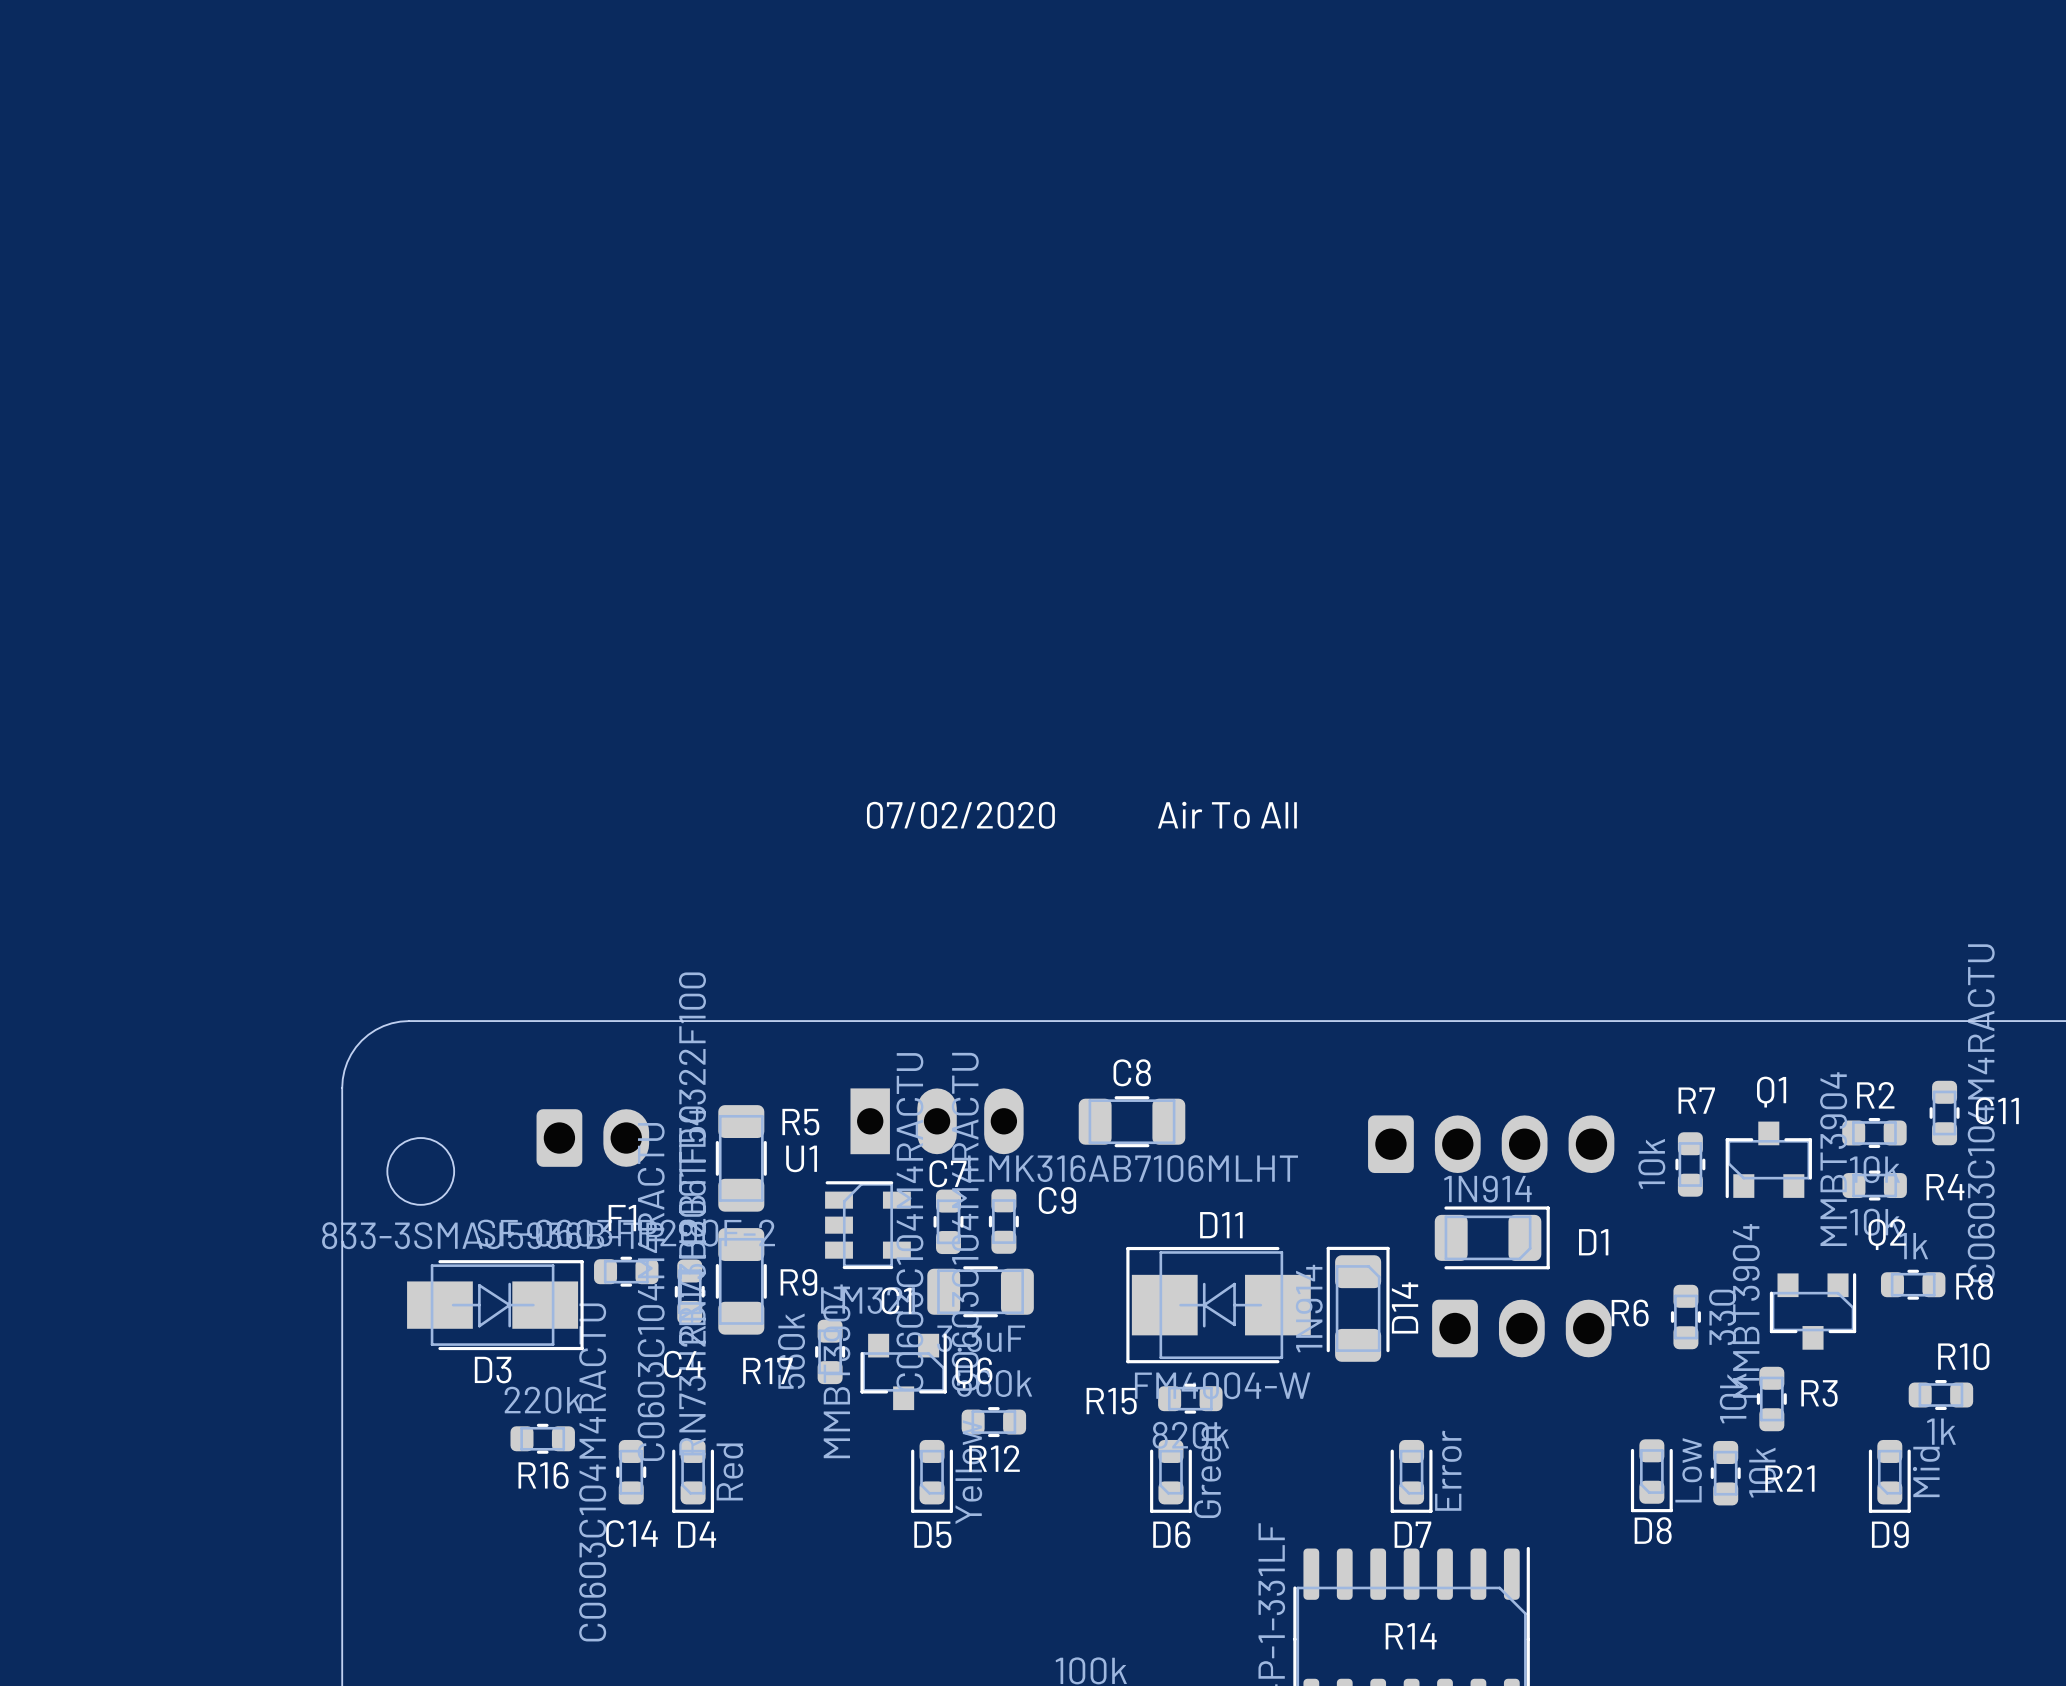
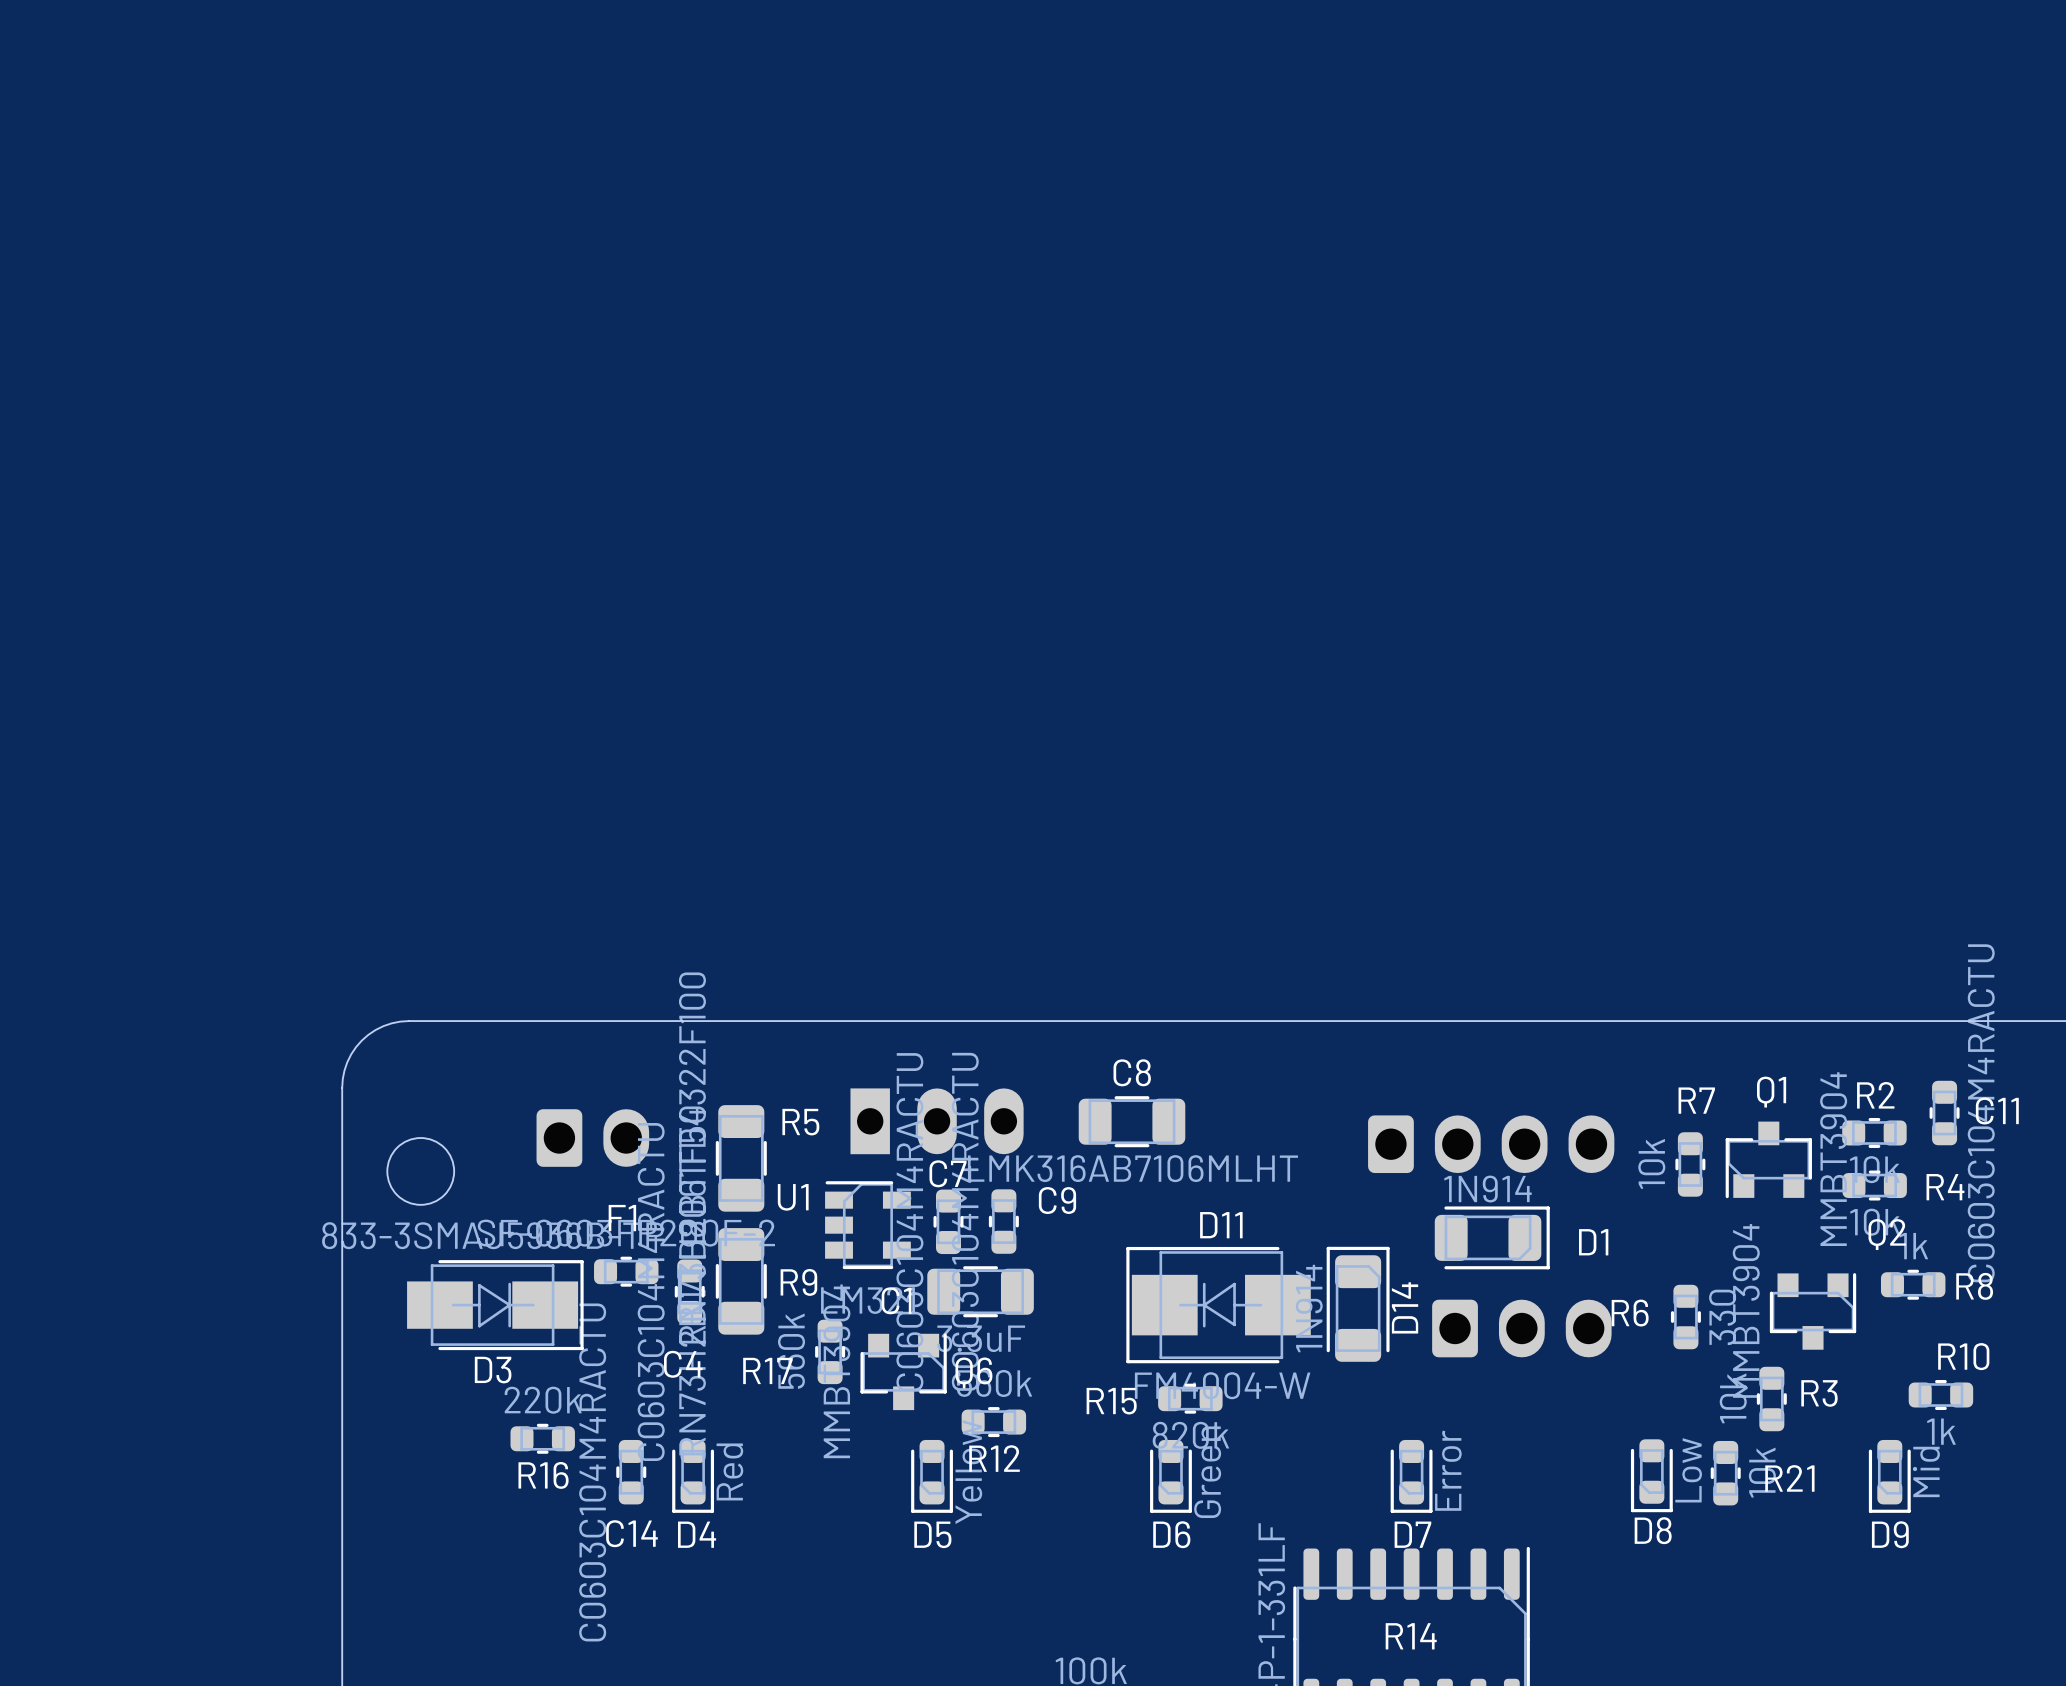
text: 07/02/2020 (960, 815) -> none
text: Air To All (1227, 815) -> none
U1 name position: U1 (801, 1158) -> U1 (793, 1197)

